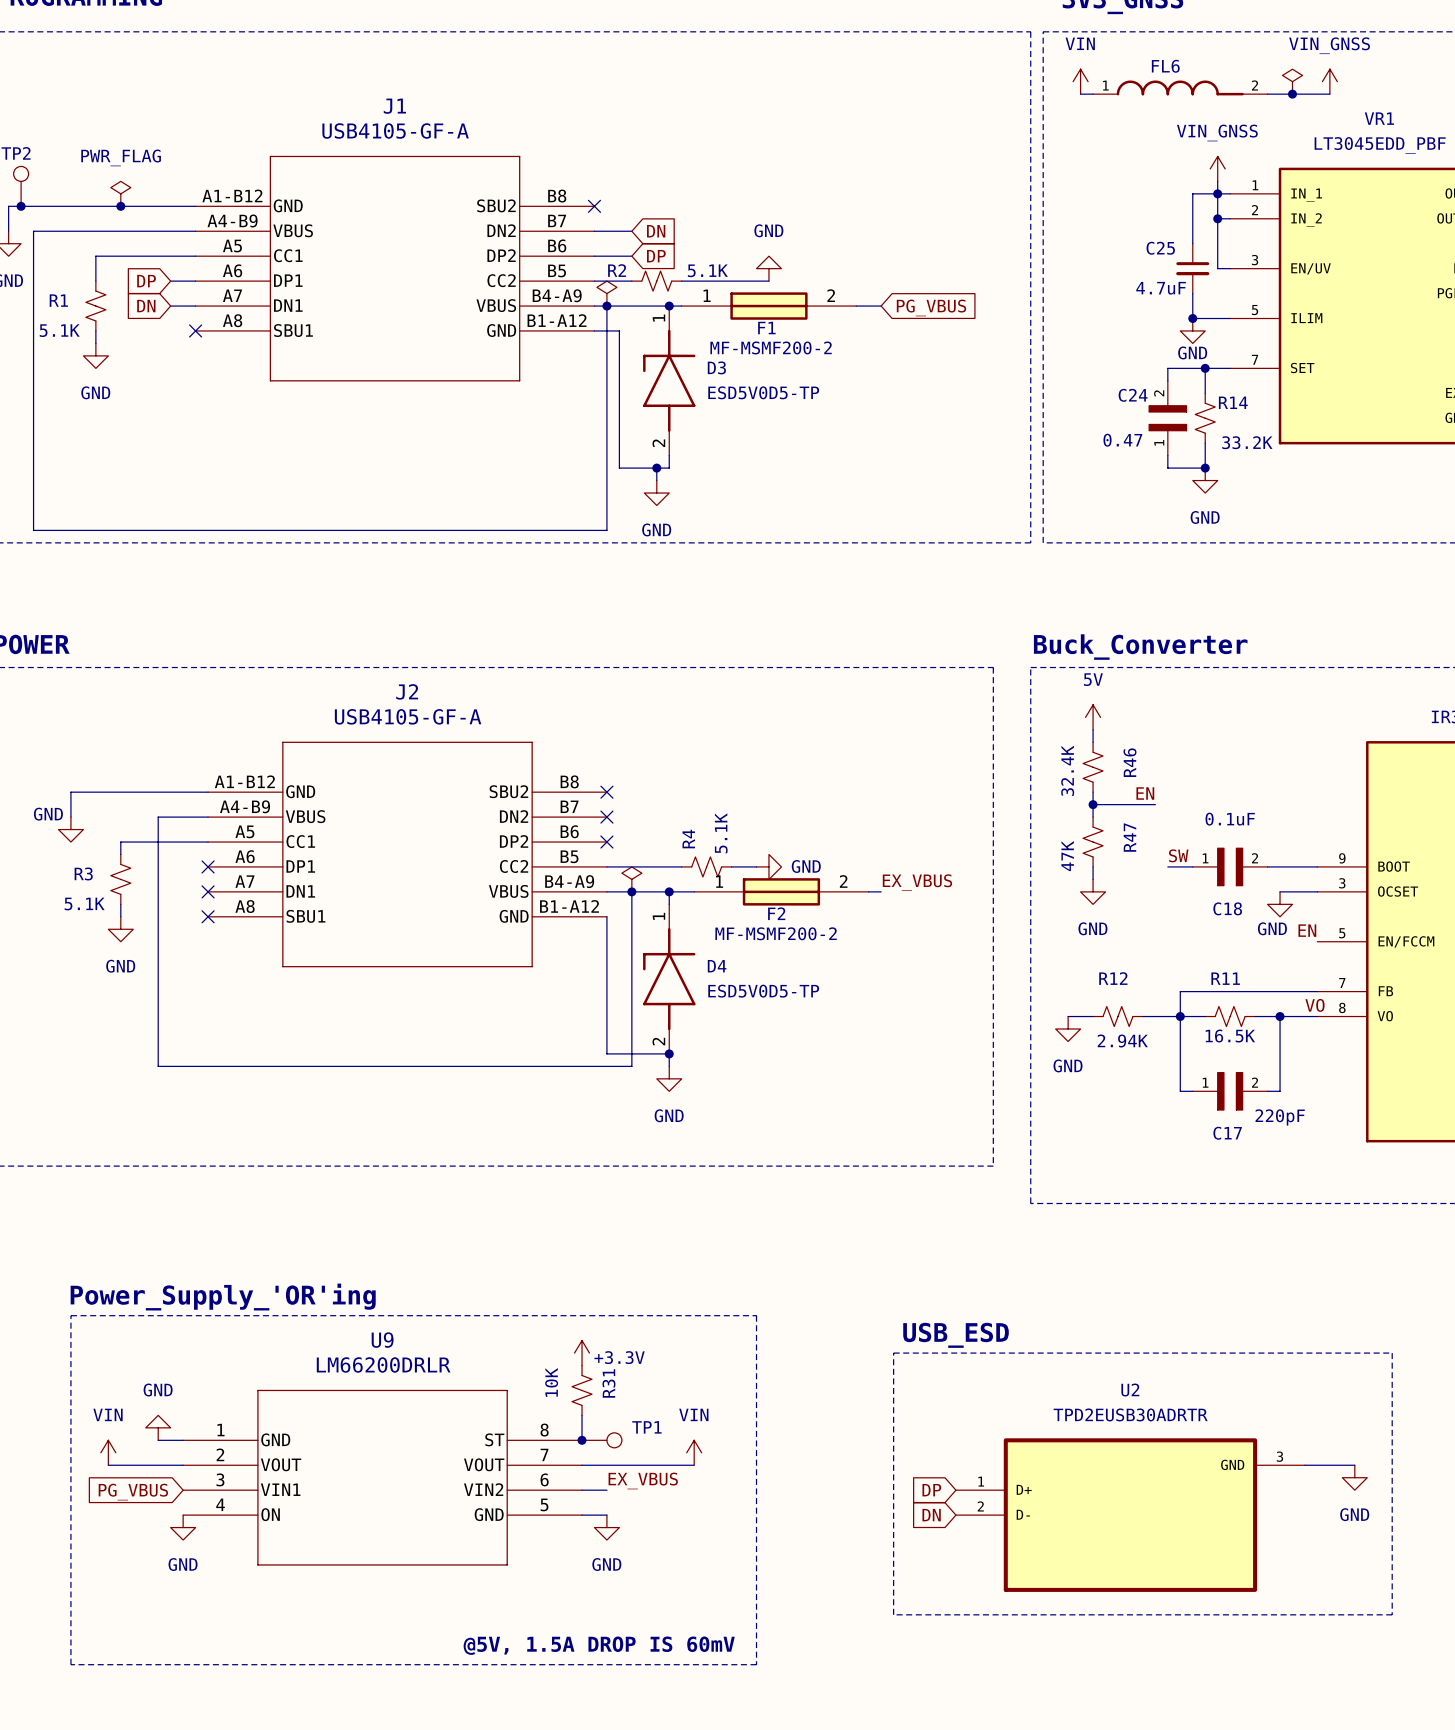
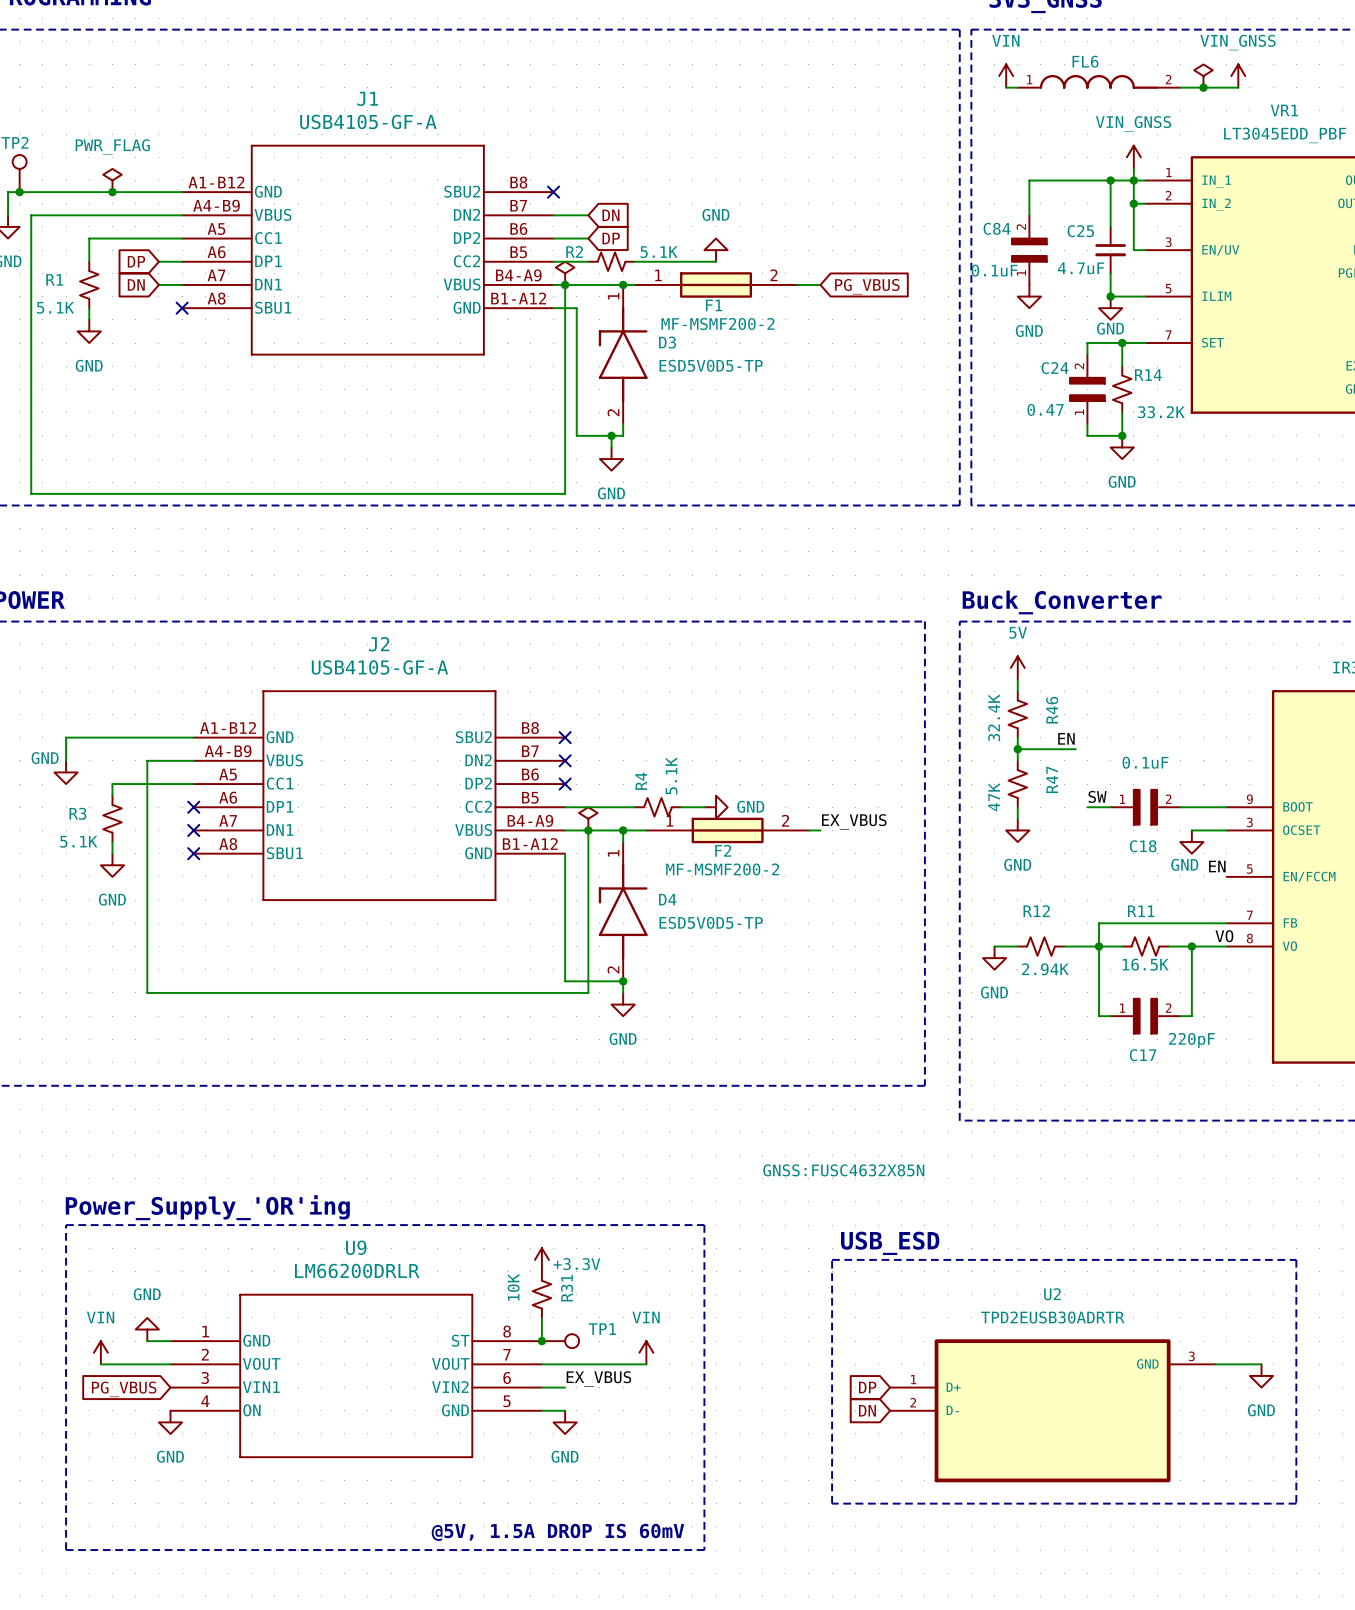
wire: none -> (1110, 180) (1029, 180) (1029, 215)
junction: none -> (1110, 180)
C84: none -> 0.1uF (1029, 250)
power symbol: none -> GND (1029, 296)
F1 text: none -> GNSS:FUSC4632X85N (843, 1170)

